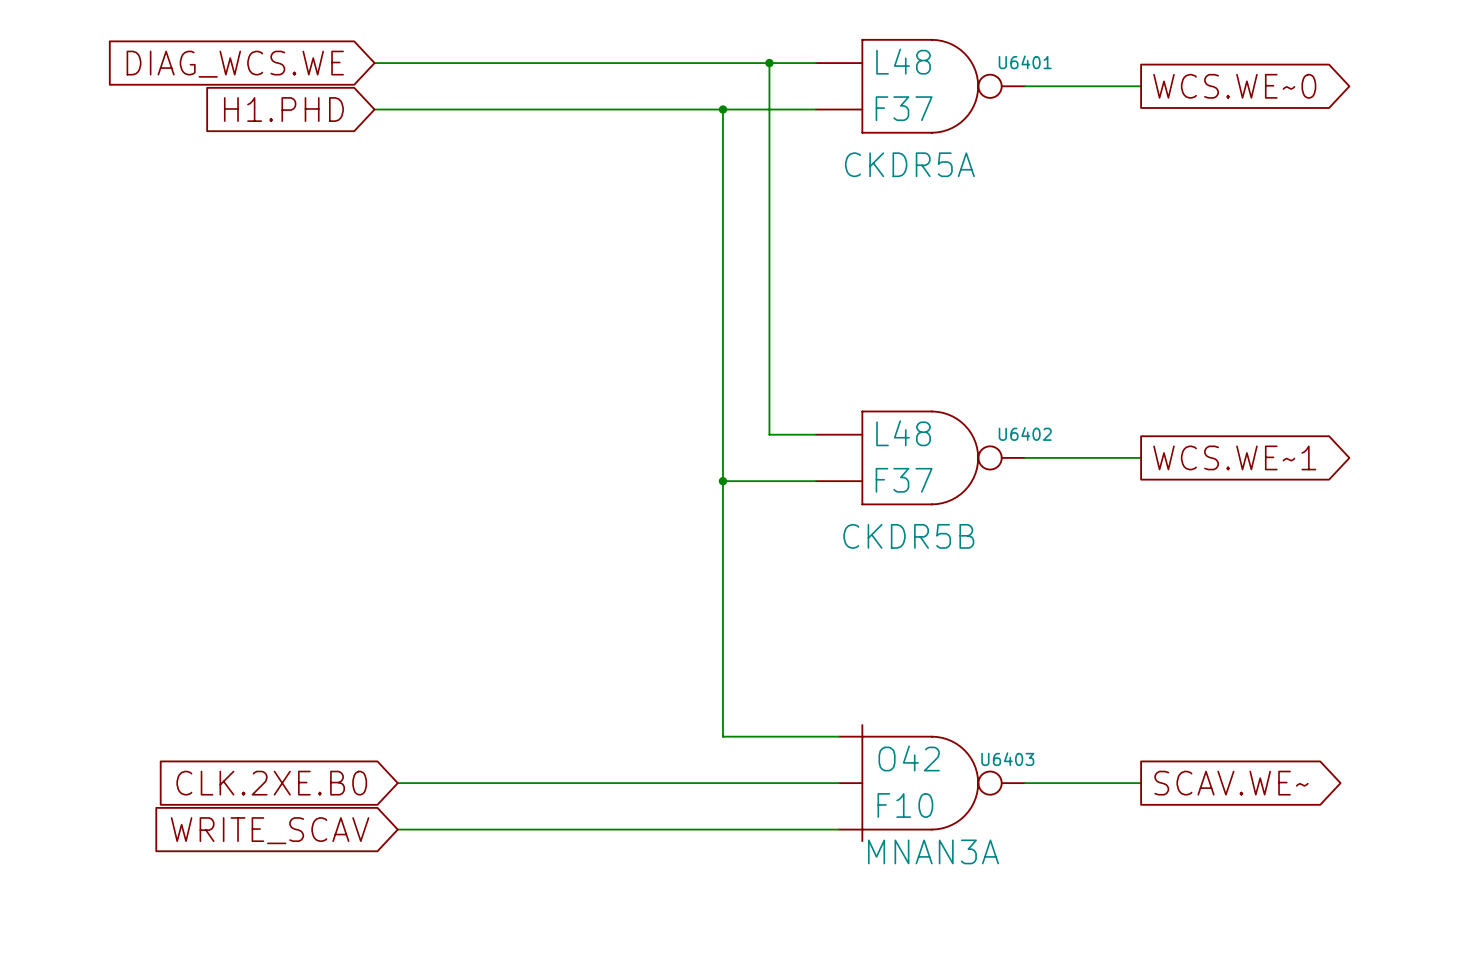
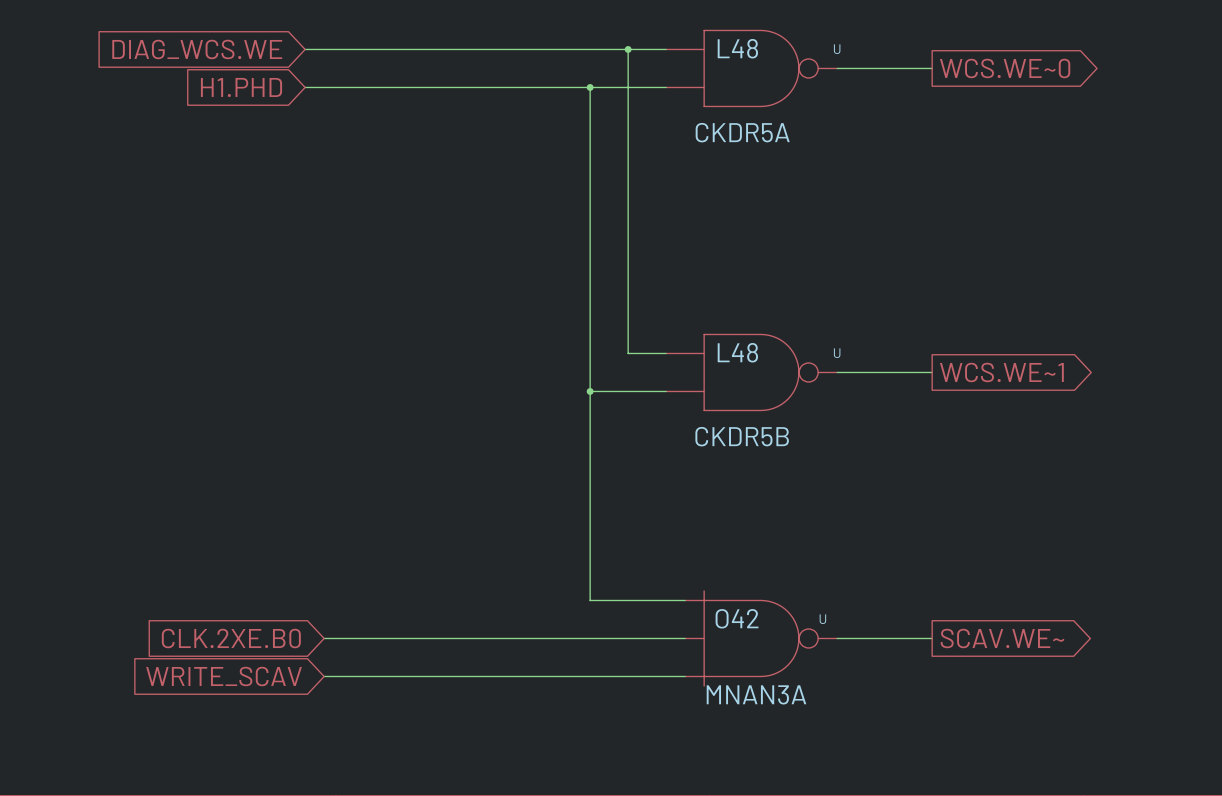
U6401 name: U6401 (1025, 62) -> U (837, 49)
U6401 value: F37 (904, 108) -> none
U6402 name: U6402 (1025, 433) -> U (837, 353)
U6402 value: F37 (904, 480) -> none
U6403 name: U6403 (1007, 759) -> U (822, 619)
U6403 value: F10 (905, 805) -> none

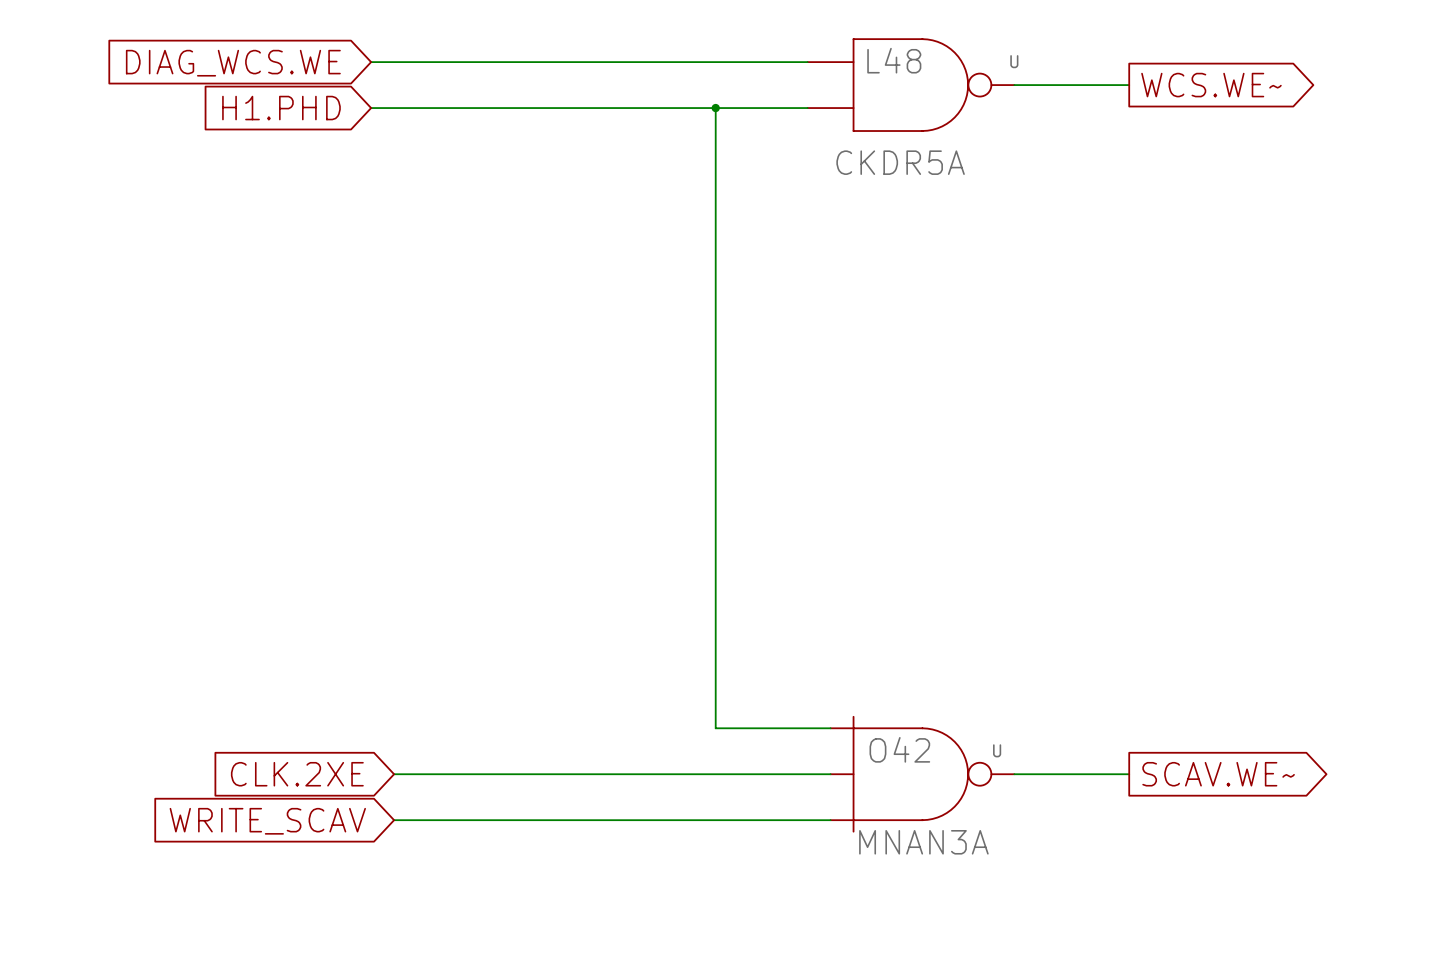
wire: (628, 49) (628, 353) (666, 353) -> none
junction: (628, 49) -> none
global label: WCS.WE~0 (1005, 68) -> WCS.WE~ (1211, 85)
U: (751, 372) -> none
wire: (837, 372) (932, 372) -> none
global label: WCS.WE~1 (1001, 372) -> none
wire: (590, 391) (666, 391) -> none
junction: (590, 391) -> none
global label: CLK.2XE.B0 (231, 638) -> CLK.2XE (297, 774)

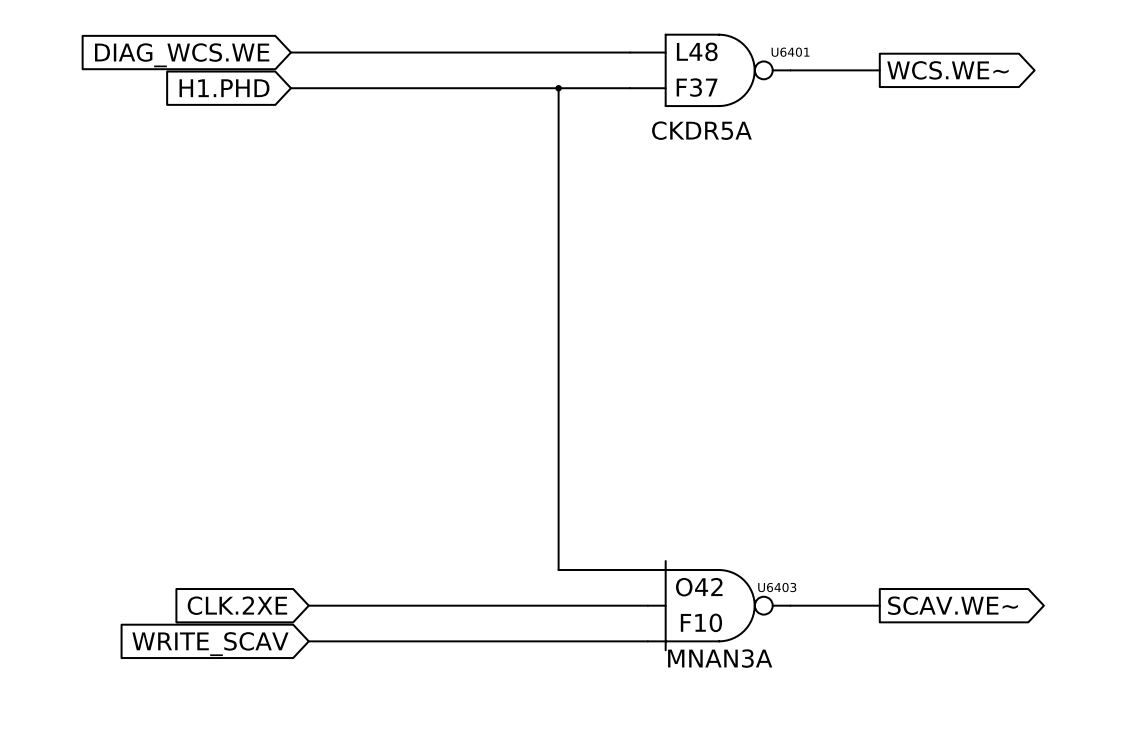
U name: U (1014, 61) -> U6401 (790, 52)
U value: none -> F37 (697, 87)
U name: U (997, 750) -> U6403 (777, 587)
U value: none -> F10 (701, 622)

